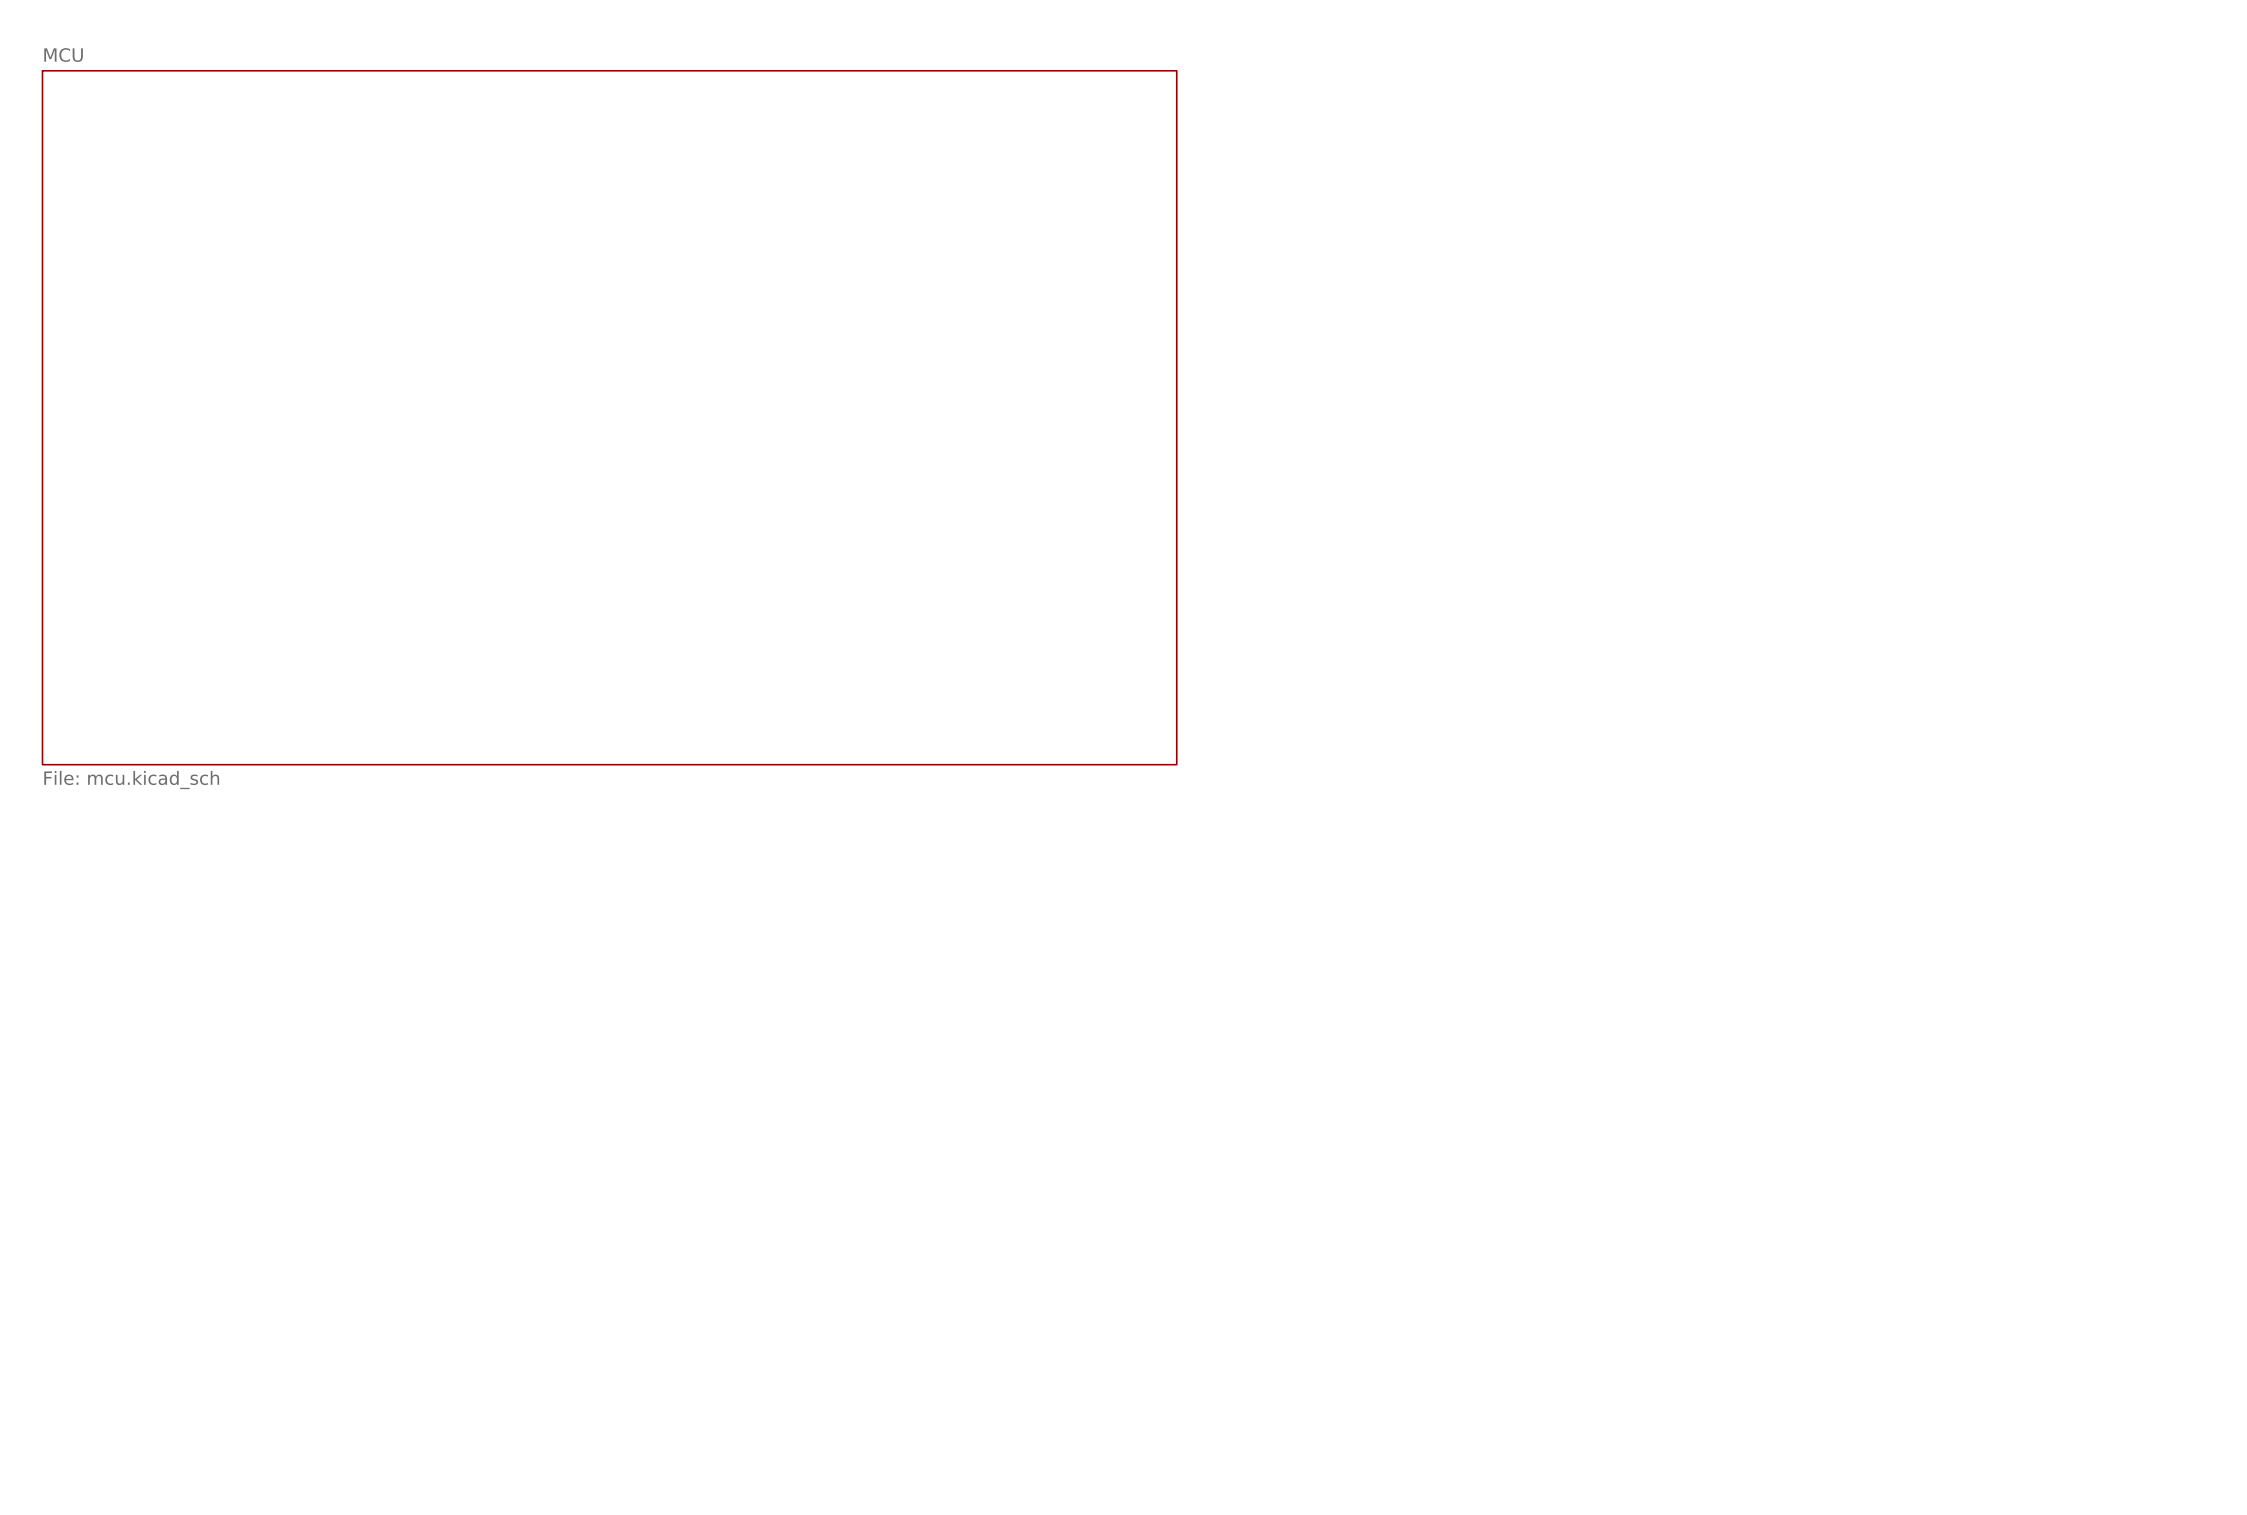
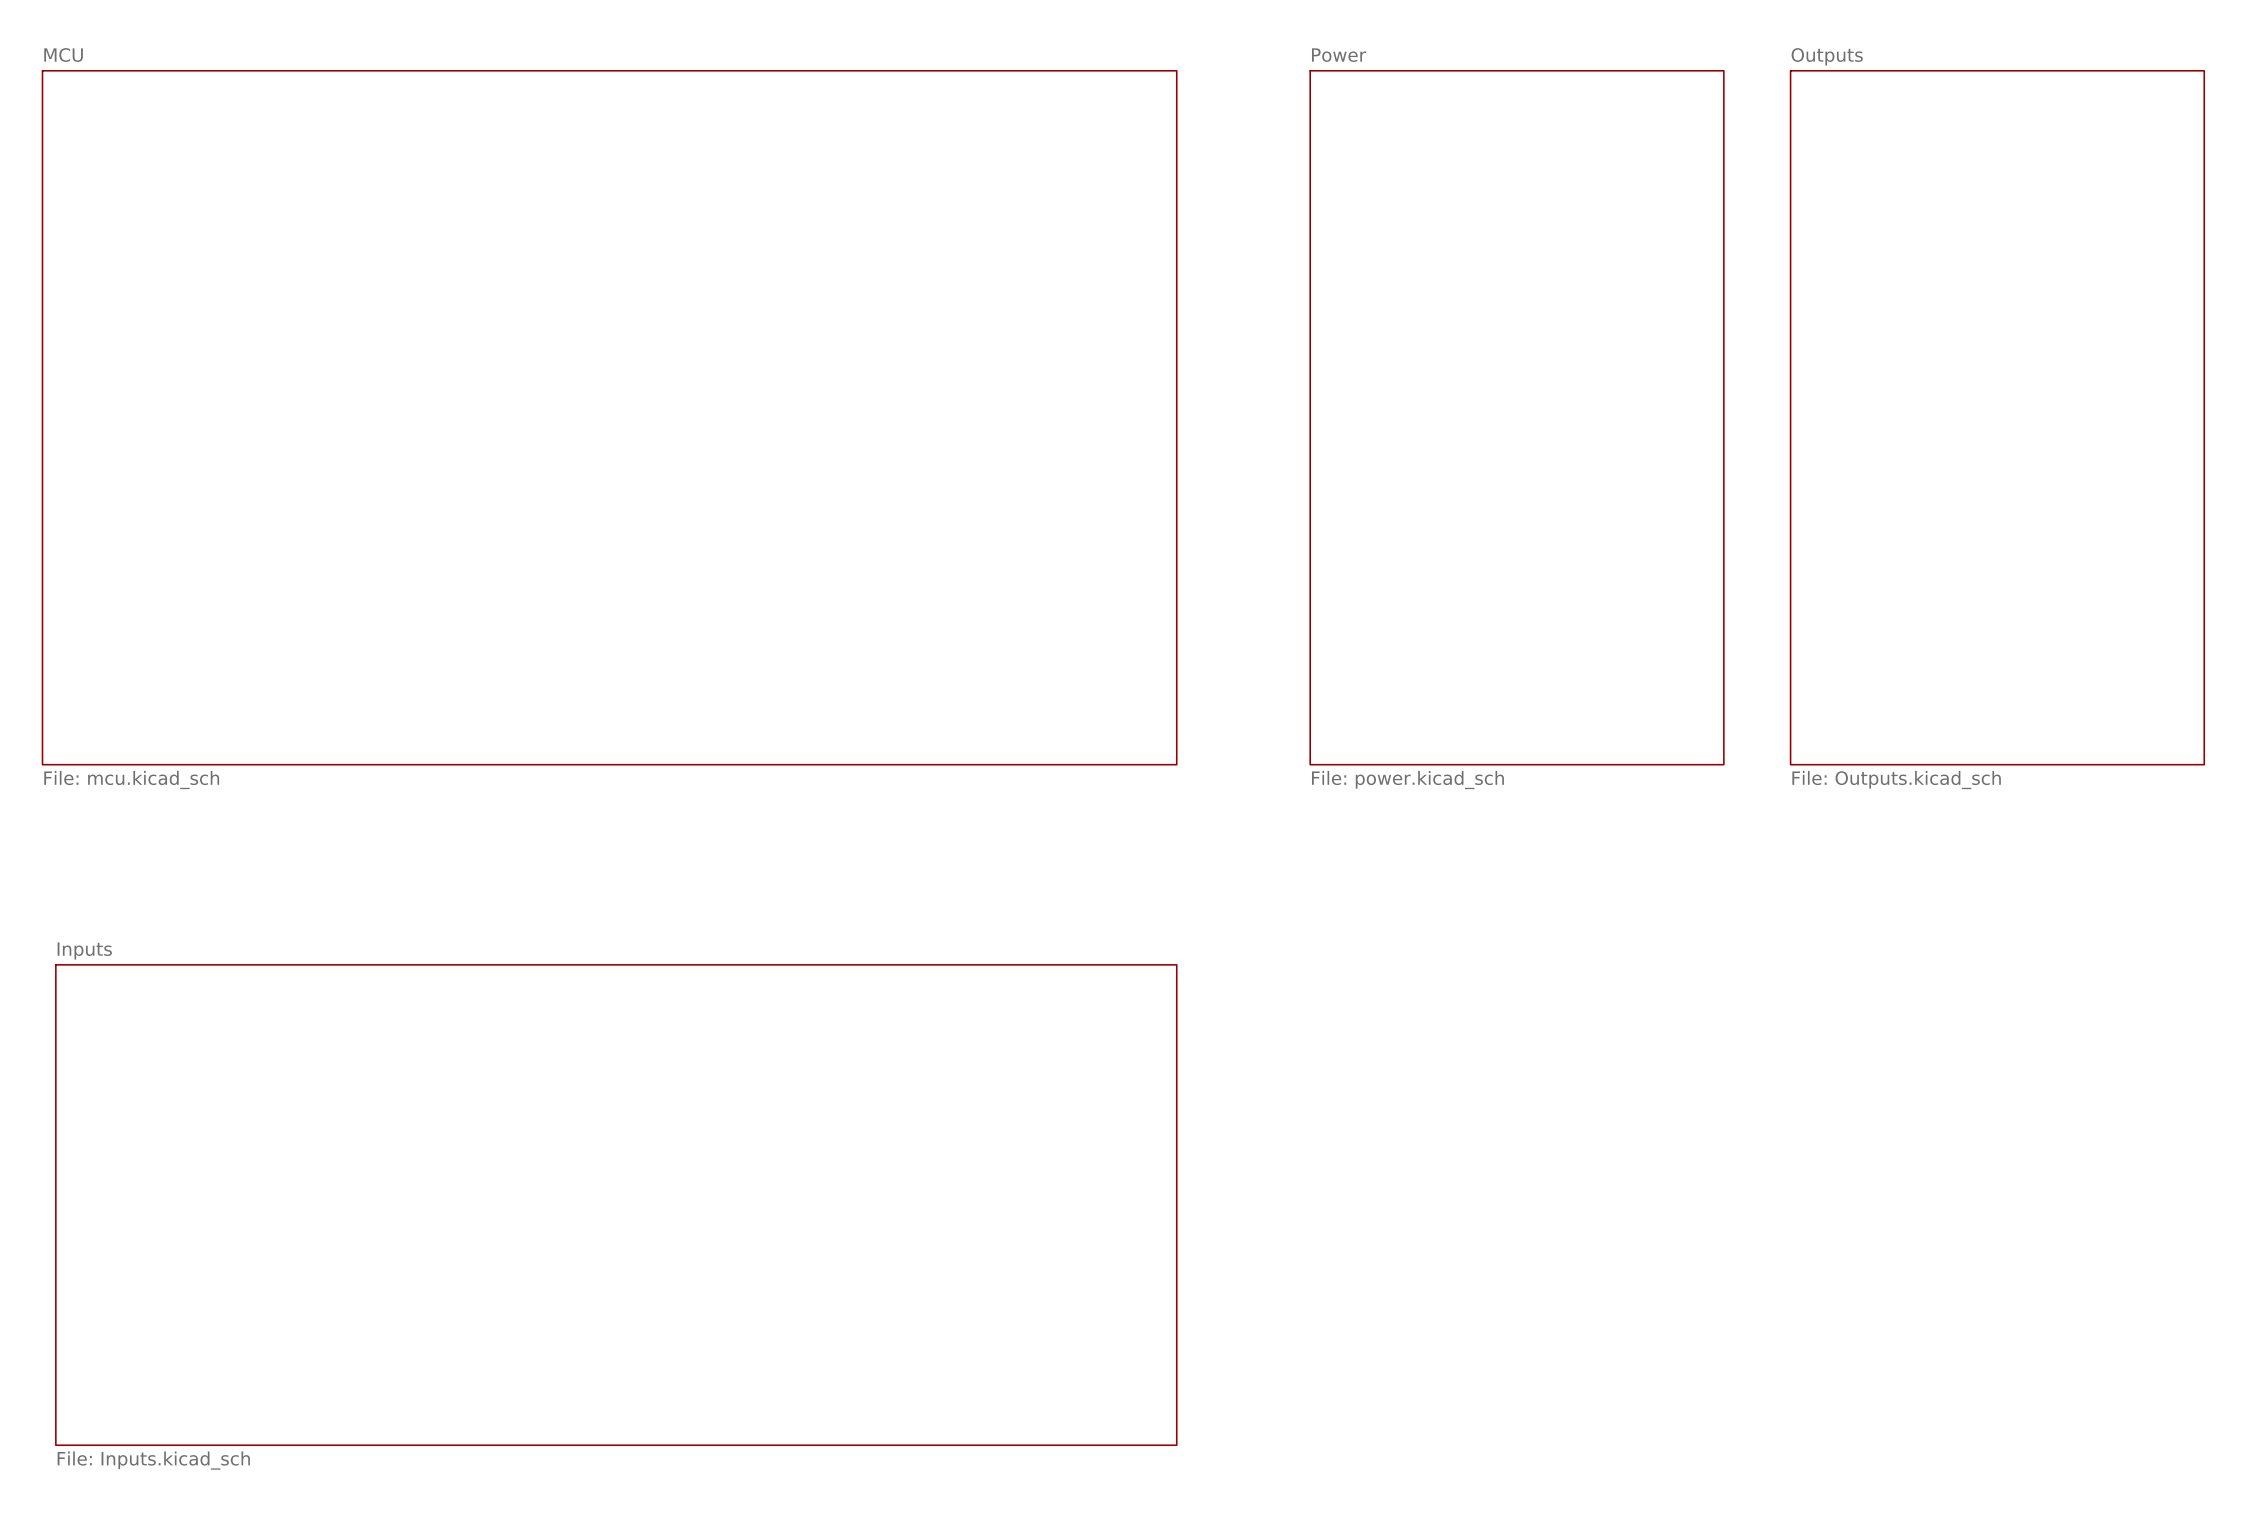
sheet Power: none -> File: power.kicad_sch (1517, 417)
sheet Outputs: none -> File: Outputs.kicad_sch (1997, 417)
sheet Inputs: none -> File: Inputs.kicad_sch (616, 1205)

